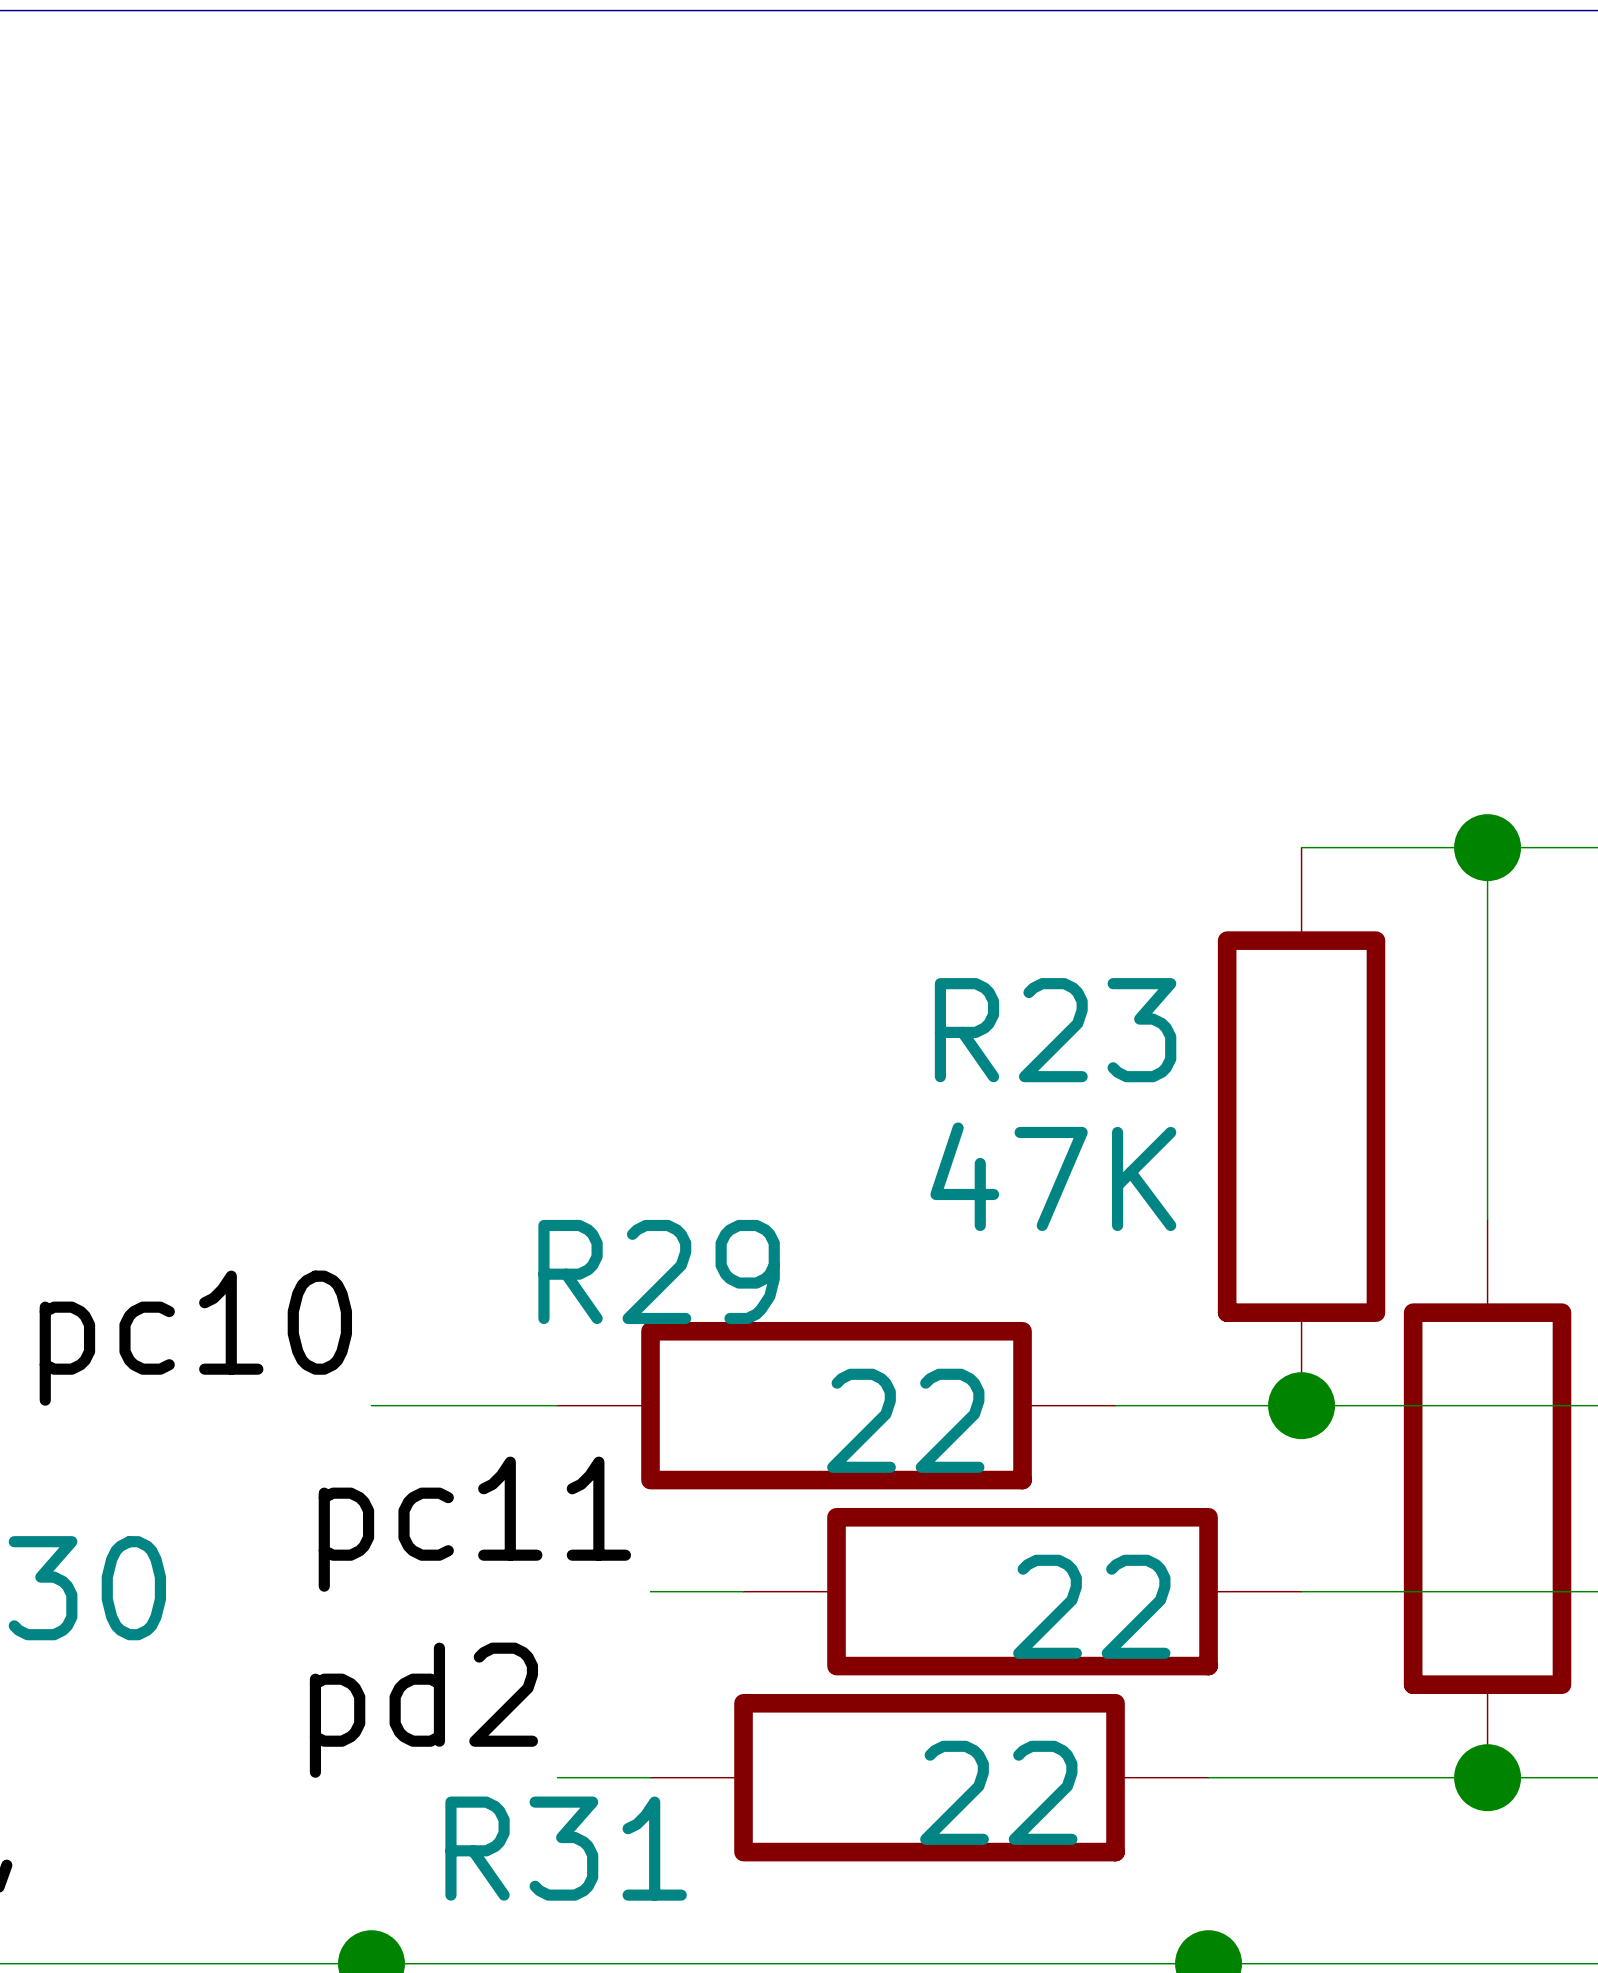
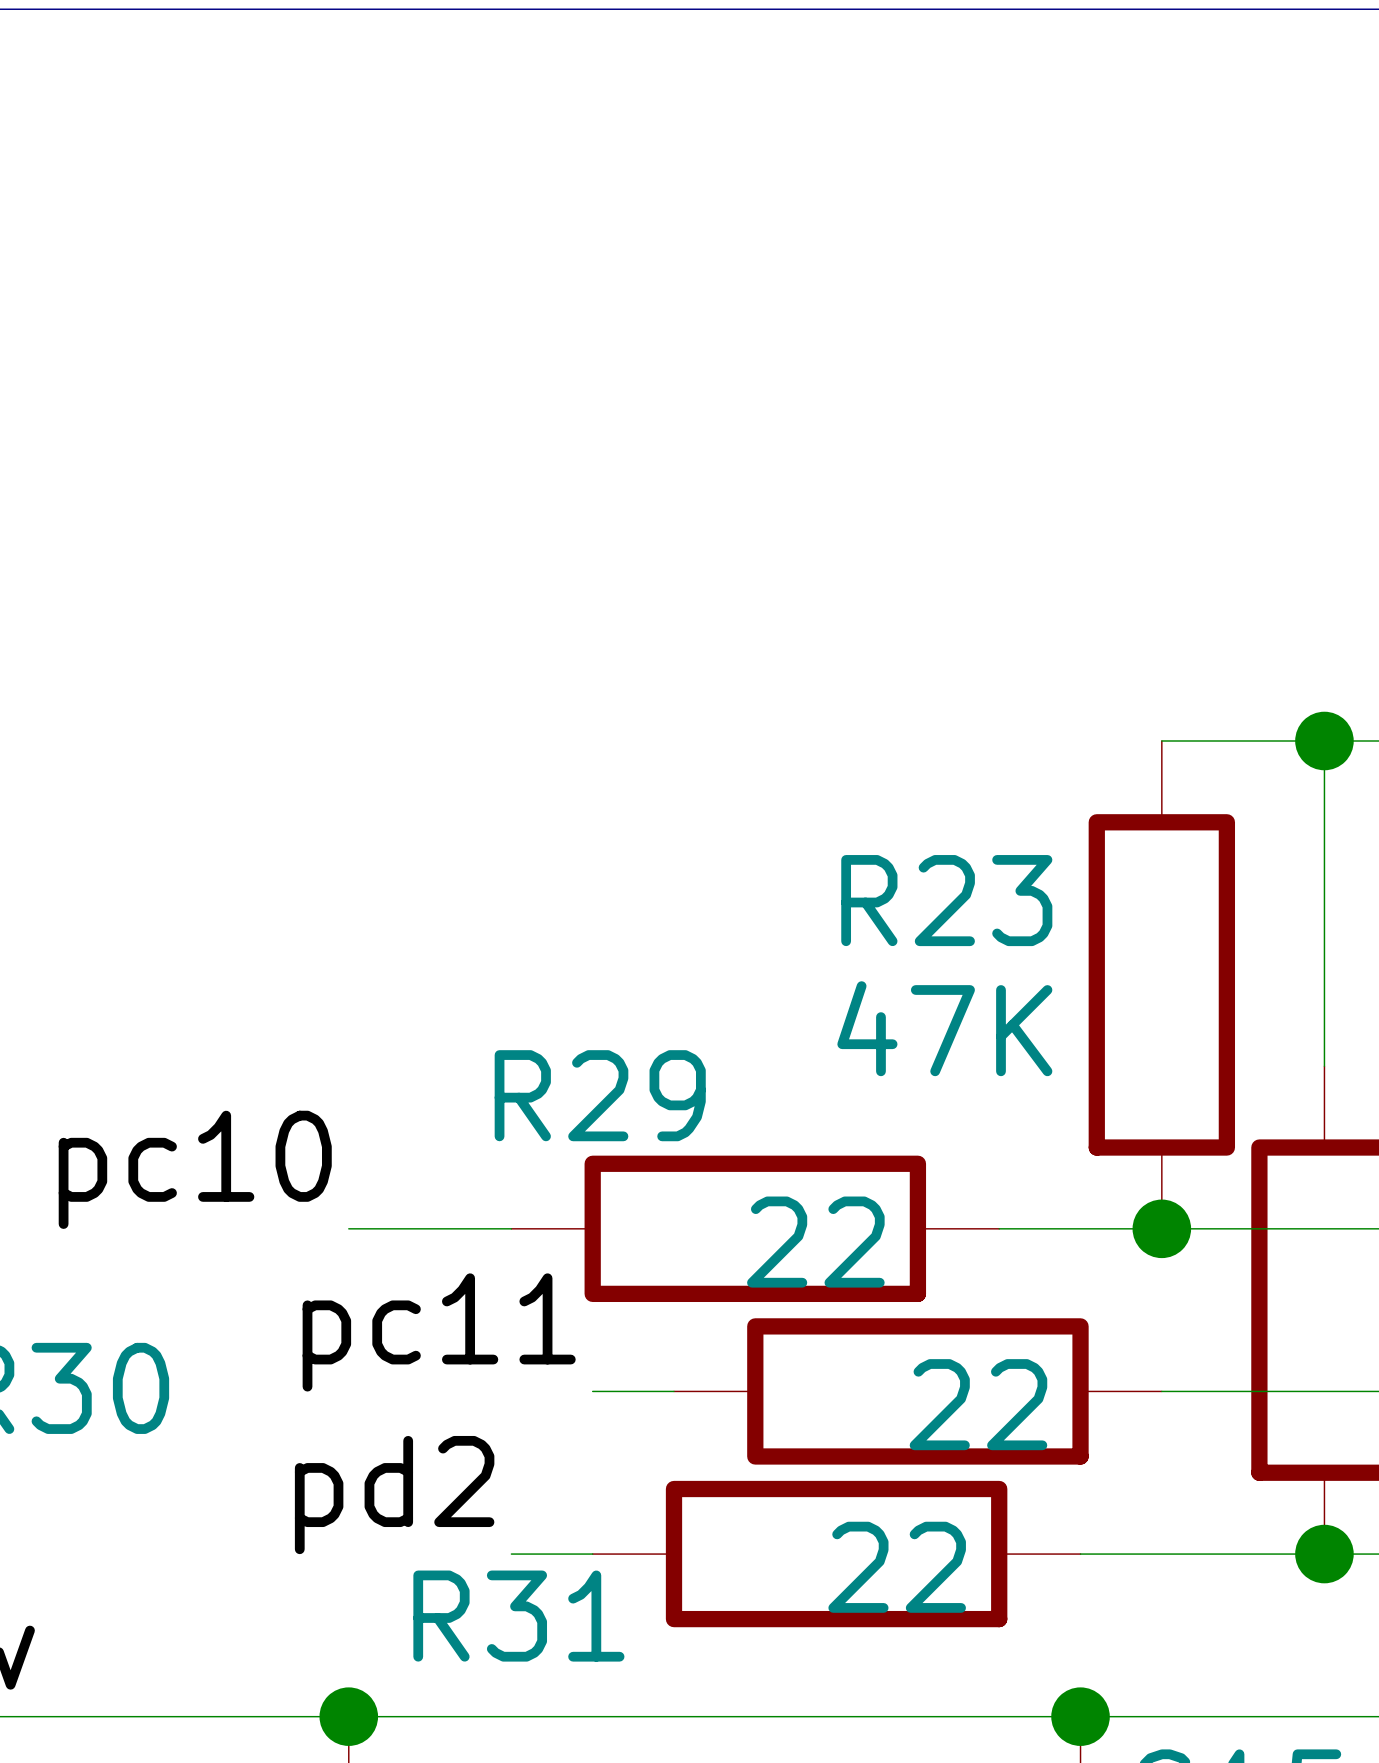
R29 name position: R29 (659, 1271) -> R29 (600, 1095)

